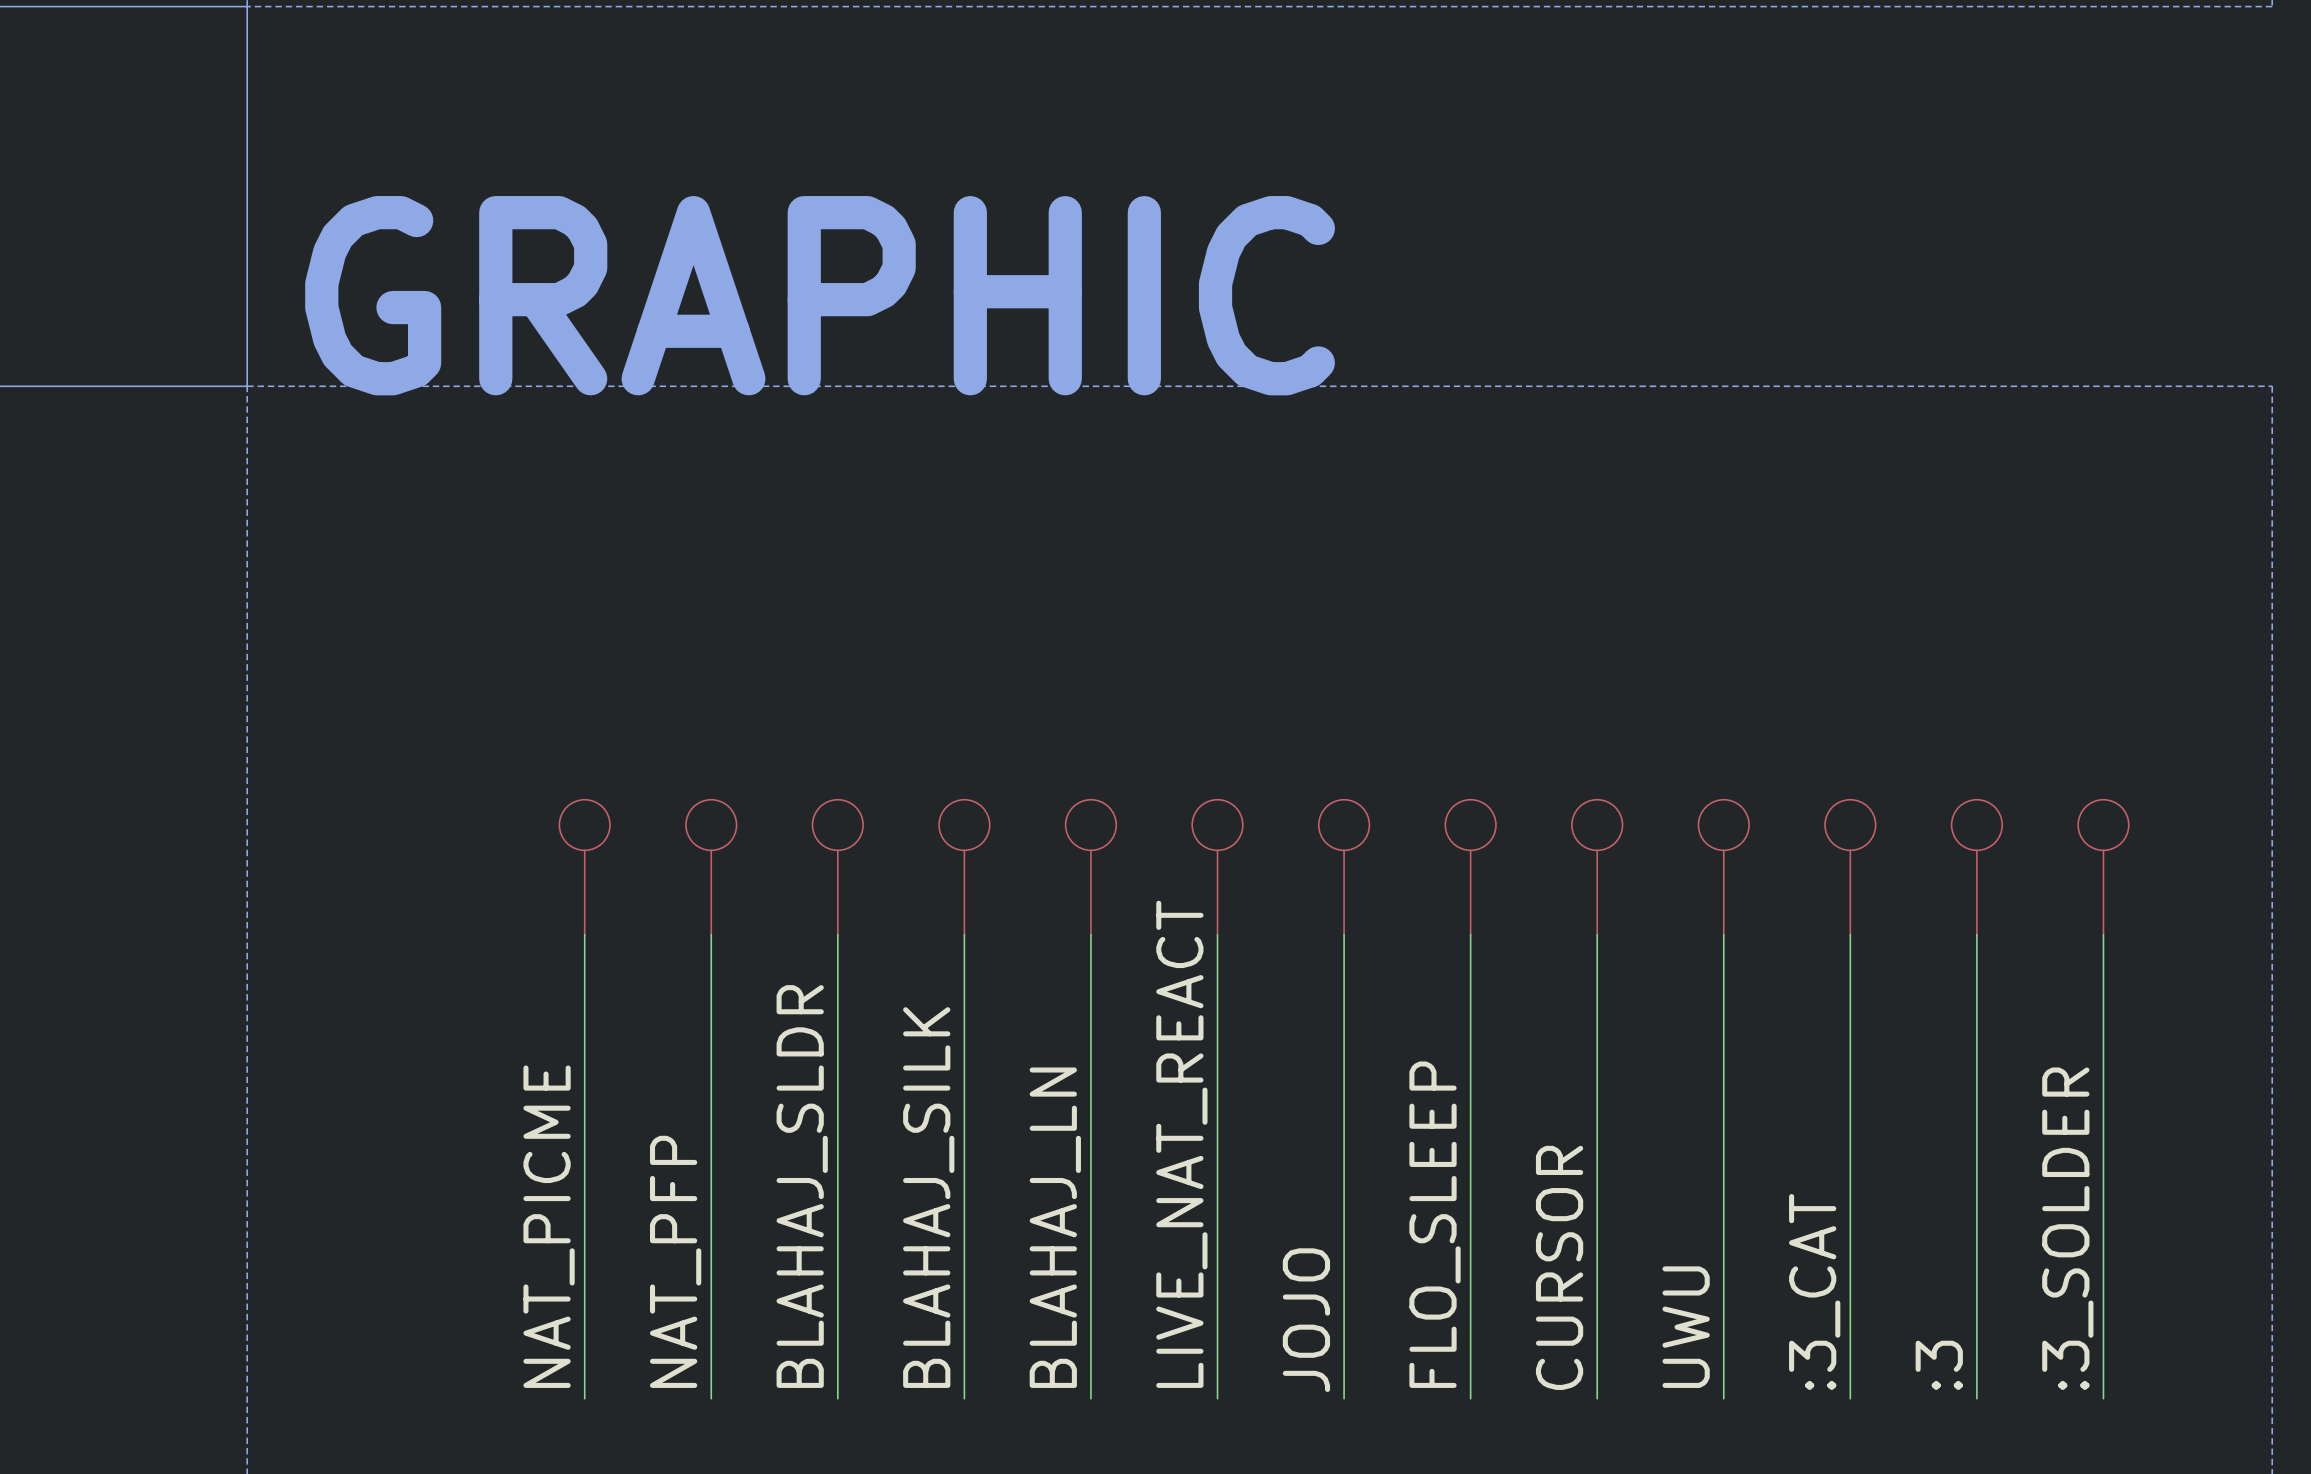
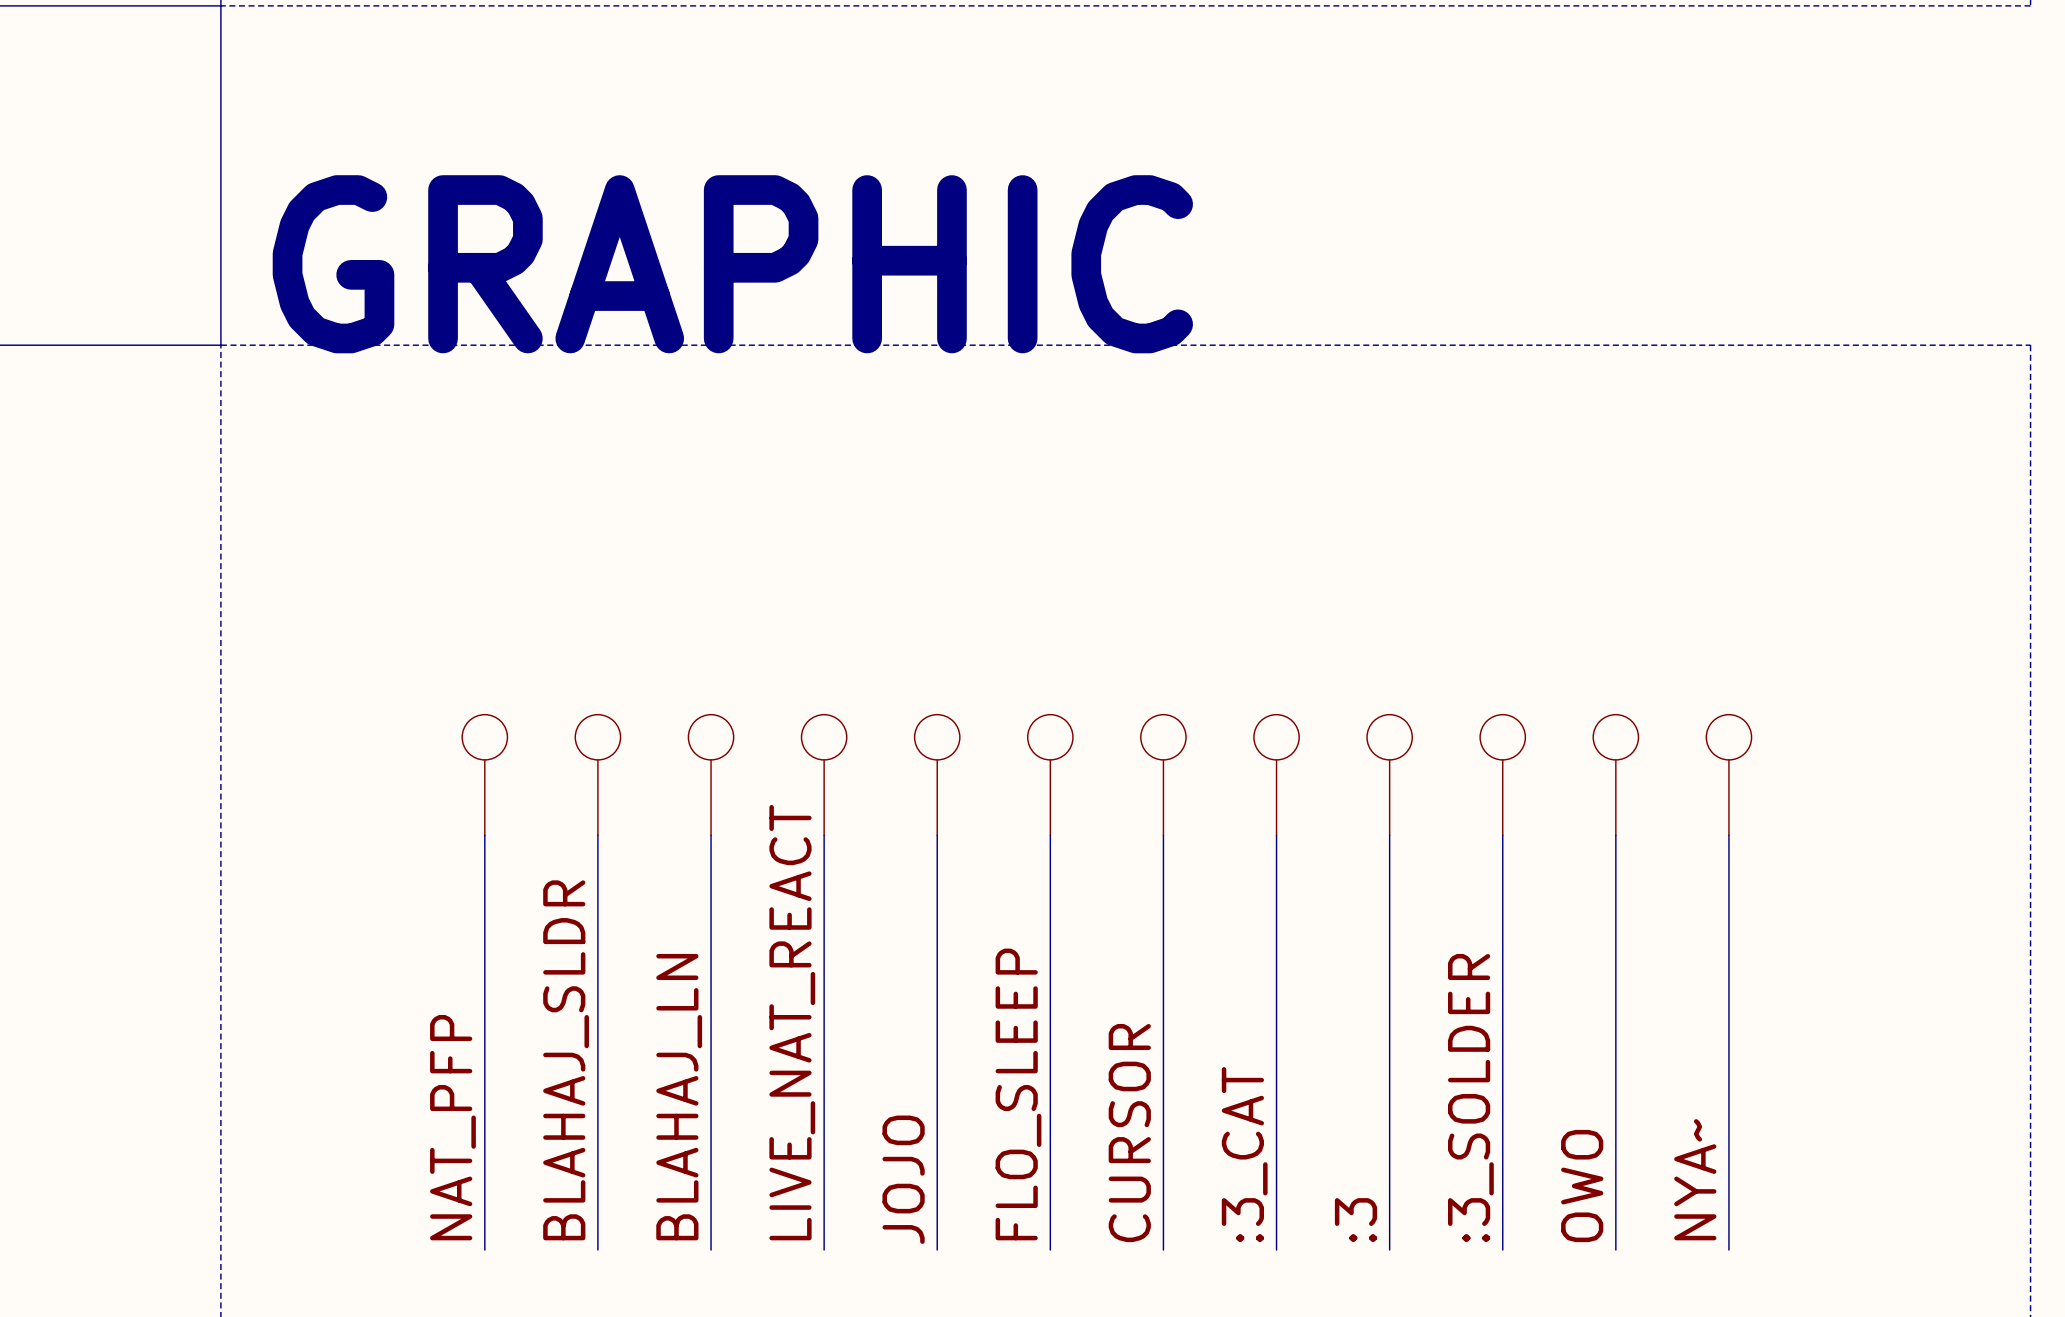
part: none -> (484, 774)
part: (584, 867) -> none
part: none -> (597, 774)
part: (711, 867) -> none
part: none -> (711, 774)
part: (837, 867) -> none
part: none -> (824, 774)
part: (964, 867) -> none
part: none -> (937, 774)
part: (1090, 867) -> none
part: none -> (1050, 774)
part: (1217, 867) -> none
part: none -> (1163, 774)
part: (1344, 867) -> none
part: none -> (1276, 774)
part: (1470, 867) -> none
part: none -> (1389, 774)
part: (1597, 867) -> none
part: none -> (1502, 774)
part: (1723, 867) -> none
part: none -> (1615, 774)
part: (1850, 867) -> none
part: none -> (1728, 774)
part: (1976, 867) -> none
part: (2103, 867) -> none
wire: (584, 934) (584, 1398) -> (484, 835) (484, 1250)
wire: (711, 934) (711, 1398) -> (597, 835) (597, 1250)
wire: (837, 934) (837, 1398) -> (711, 835) (711, 1250)
wire: (964, 934) (964, 1398) -> (824, 835) (824, 1250)
wire: (1090, 934) (1090, 1398) -> (937, 835) (937, 1250)
wire: (1217, 934) (1217, 1398) -> (1050, 835) (1050, 1250)
wire: (1344, 934) (1344, 1398) -> (1163, 835) (1163, 1250)
wire: (1470, 934) (1470, 1398) -> (1276, 835) (1276, 1250)
wire: (1597, 934) (1597, 1398) -> (1389, 835) (1389, 1250)
wire: (1723, 934) (1723, 1398) -> (1502, 835) (1502, 1250)
wire: (1850, 934) (1850, 1398) -> (1615, 835) (1615, 1250)
wire: (1976, 934) (1976, 1398) -> (1728, 835) (1728, 1250)
wire: (2103, 934) (2103, 1398) -> none
label position: LIVE_NAT_REACT (1181, 1144) -> LIVE_NAT_REACT (792, 1022)
label position: BLAHAJ_SLDR (802, 1186) -> BLAHAJ_SLDR (566, 1060)
label: BLAHAJ_SILK (928, 1197) -> none
label position: FLO_SLEEP (1435, 1224) -> FLO_SLEEP (1018, 1094)
label: NAT_PICME (549, 1226) -> none
label position: BLAHAJ_LN (1055, 1227) -> BLAHAJ_LN (679, 1097)
label position: :3_SOLDER (2067, 1228) -> :3_SOLDER (1470, 1098)
label position: NAT_PFP (675, 1261) -> NAT_PFP (452, 1127)
label position: CURSOR (1559, 1267) -> CURSOR (1129, 1133)
label position: :3_CAT (1814, 1292) -> :3_CAT (1244, 1154)
label position: JOJO (1306, 1320) -> JOJO (903, 1179)
label: none -> NYA~ (1695, 1179)
label: UWU (1686, 1327) -> none
label: none -> OWO (1582, 1186)
label position: :3 (1939, 1365) -> :3 (1356, 1220)

